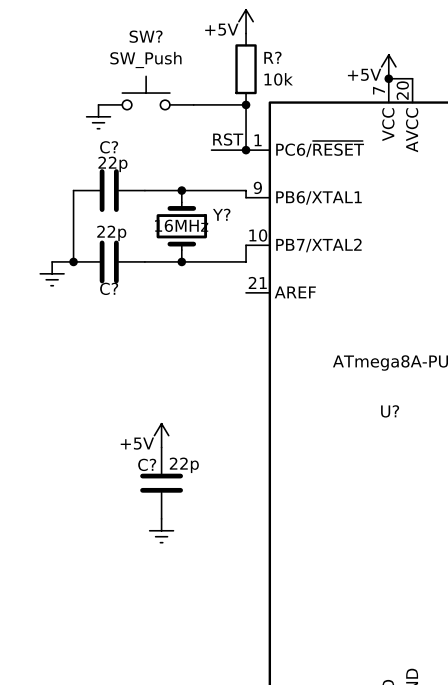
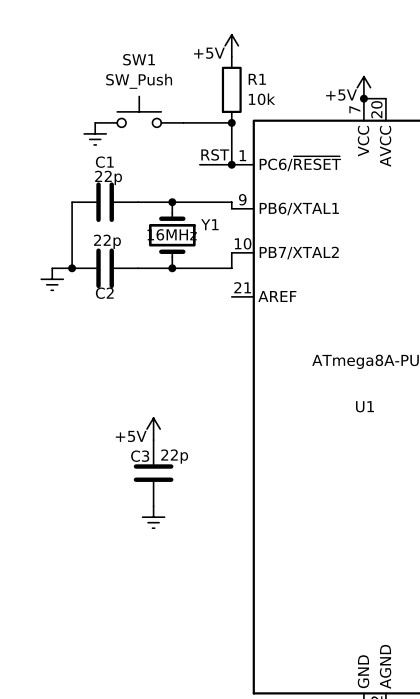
SW? name: SW? (146, 36) -> SW1 (139, 59)
R? name: R? (272, 57) -> R1 (257, 79)
C? name: C? (109, 147) -> C1 (104, 162)
Y? name: Y? (221, 214) -> Y1 (209, 224)
C? name: C? (109, 288) -> C2 (104, 293)
U? name: U? (390, 411) -> U1 (364, 406)
C? name: C? (147, 464) -> C3 (140, 456)

